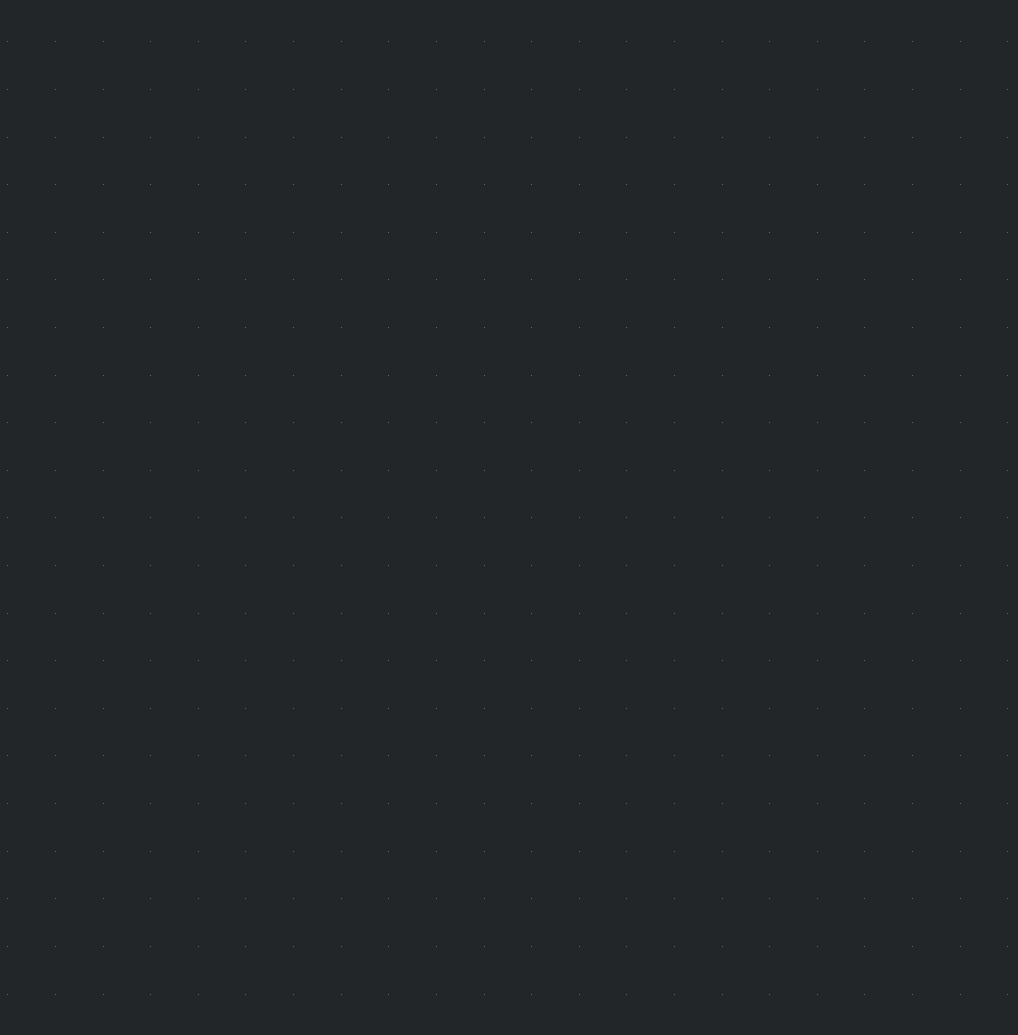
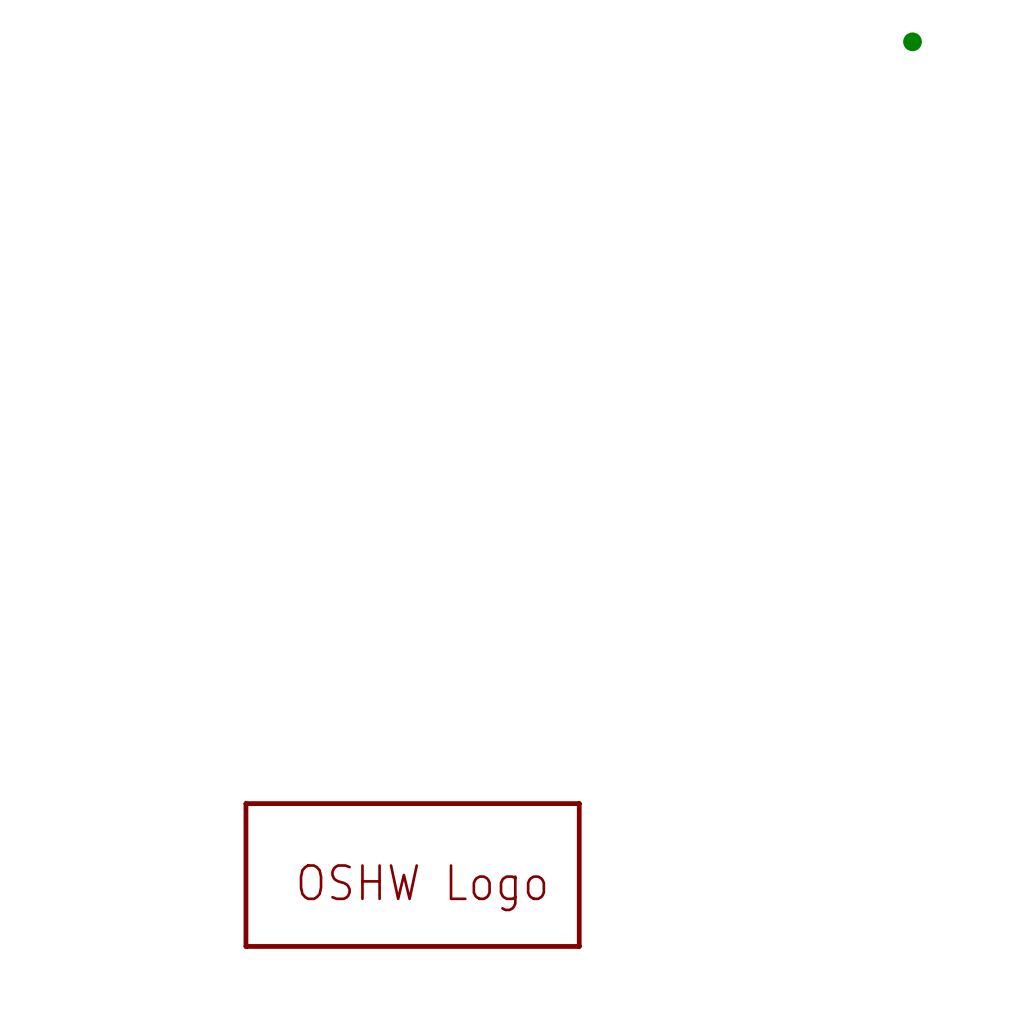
junction: none -> (912, 41)
part: none -> (412, 875)

